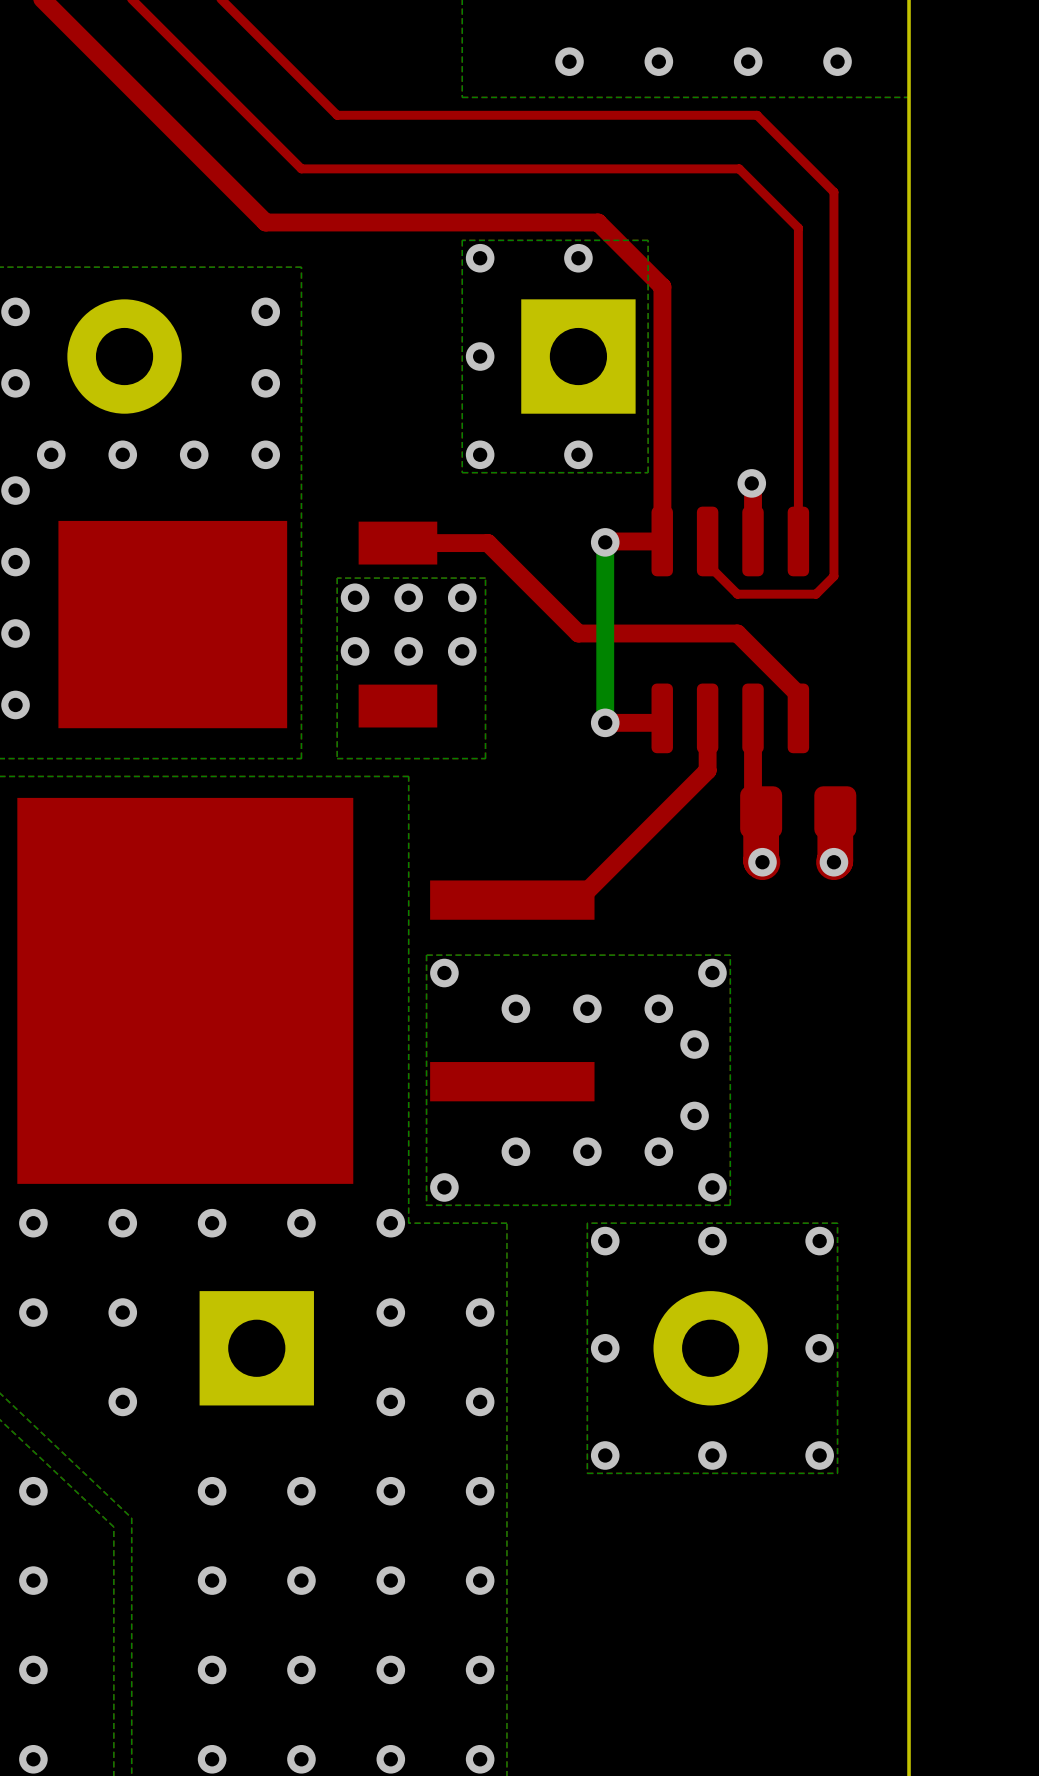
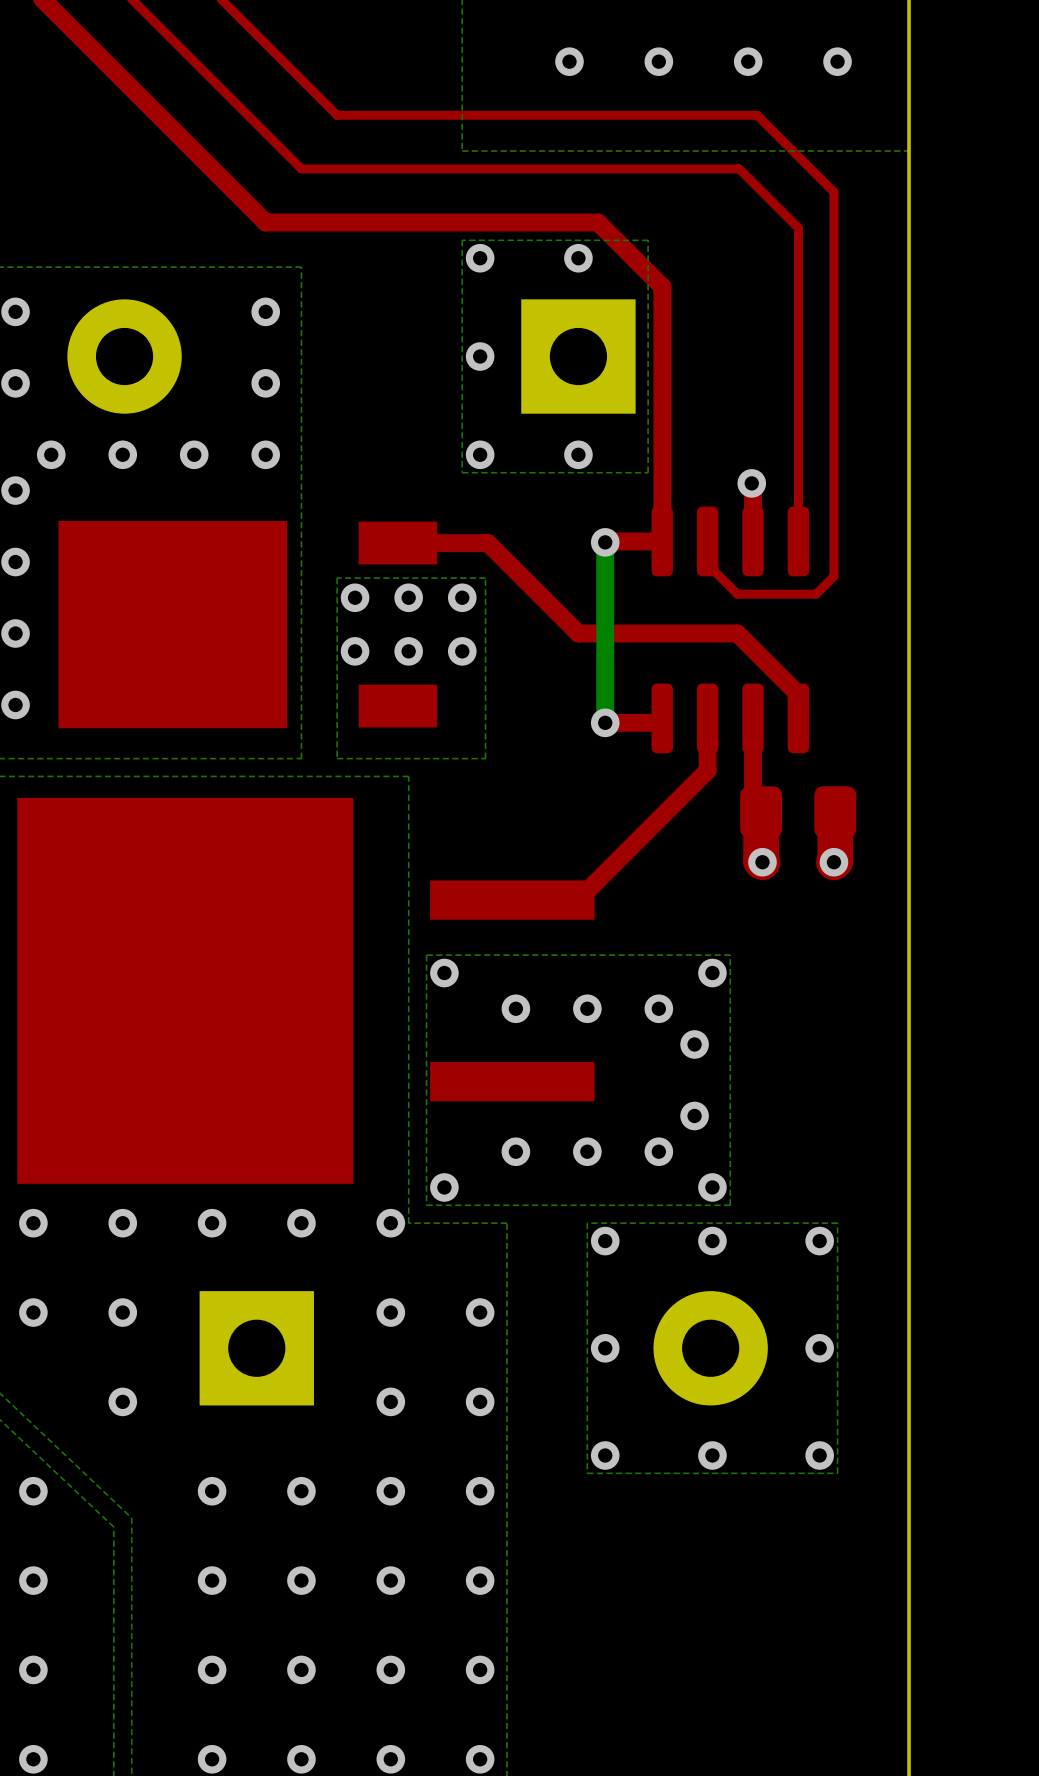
bottom zone outline: (909, 97) (462, 97) -> (909, 97) (909, 151) (462, 151) (462, 97)

